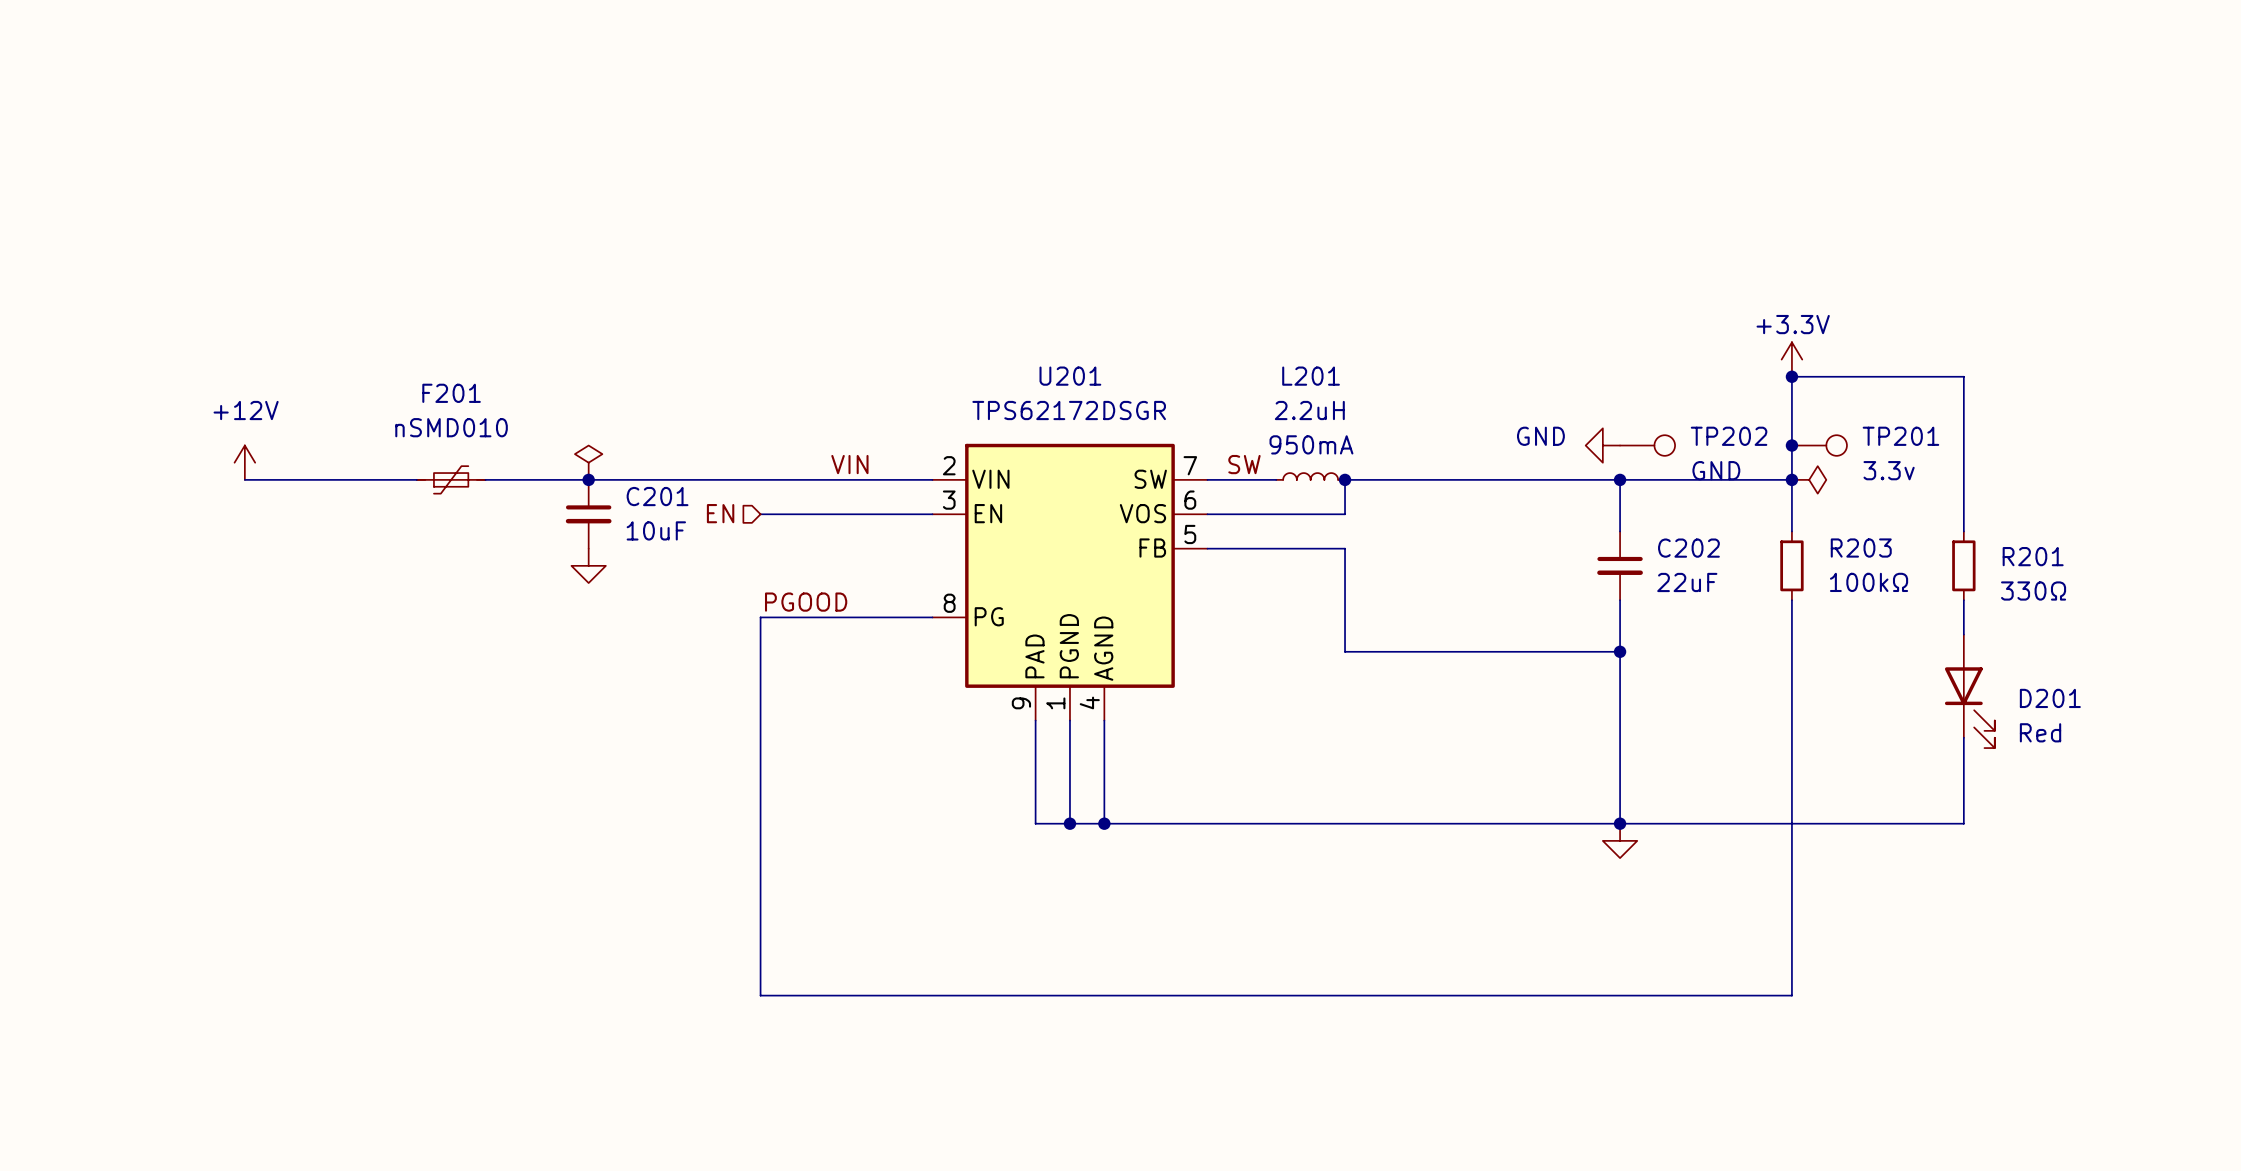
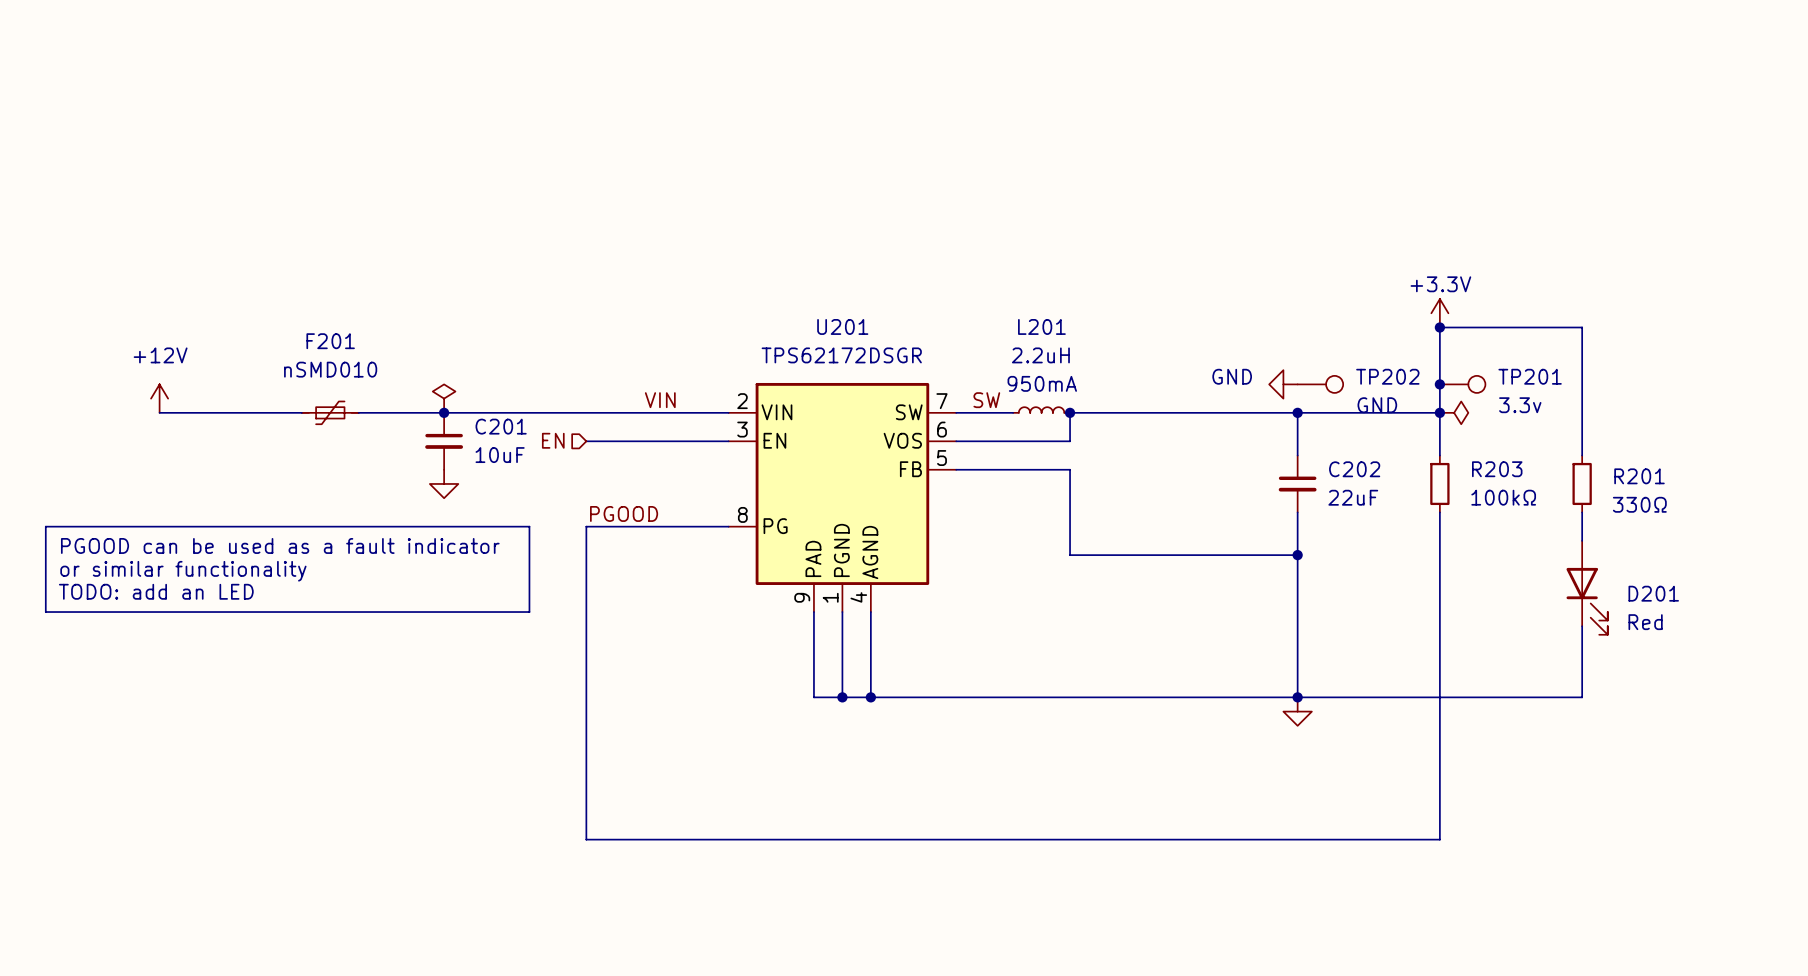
line: none -> (45, 526) (529, 526) (529, 612) (45, 612) (45, 526)
text: none -> PGOOD can be used as a fault indicator (280, 545)
text: none -> or similar functionality (183, 571)
text: none -> TODO: add an LED (156, 591)

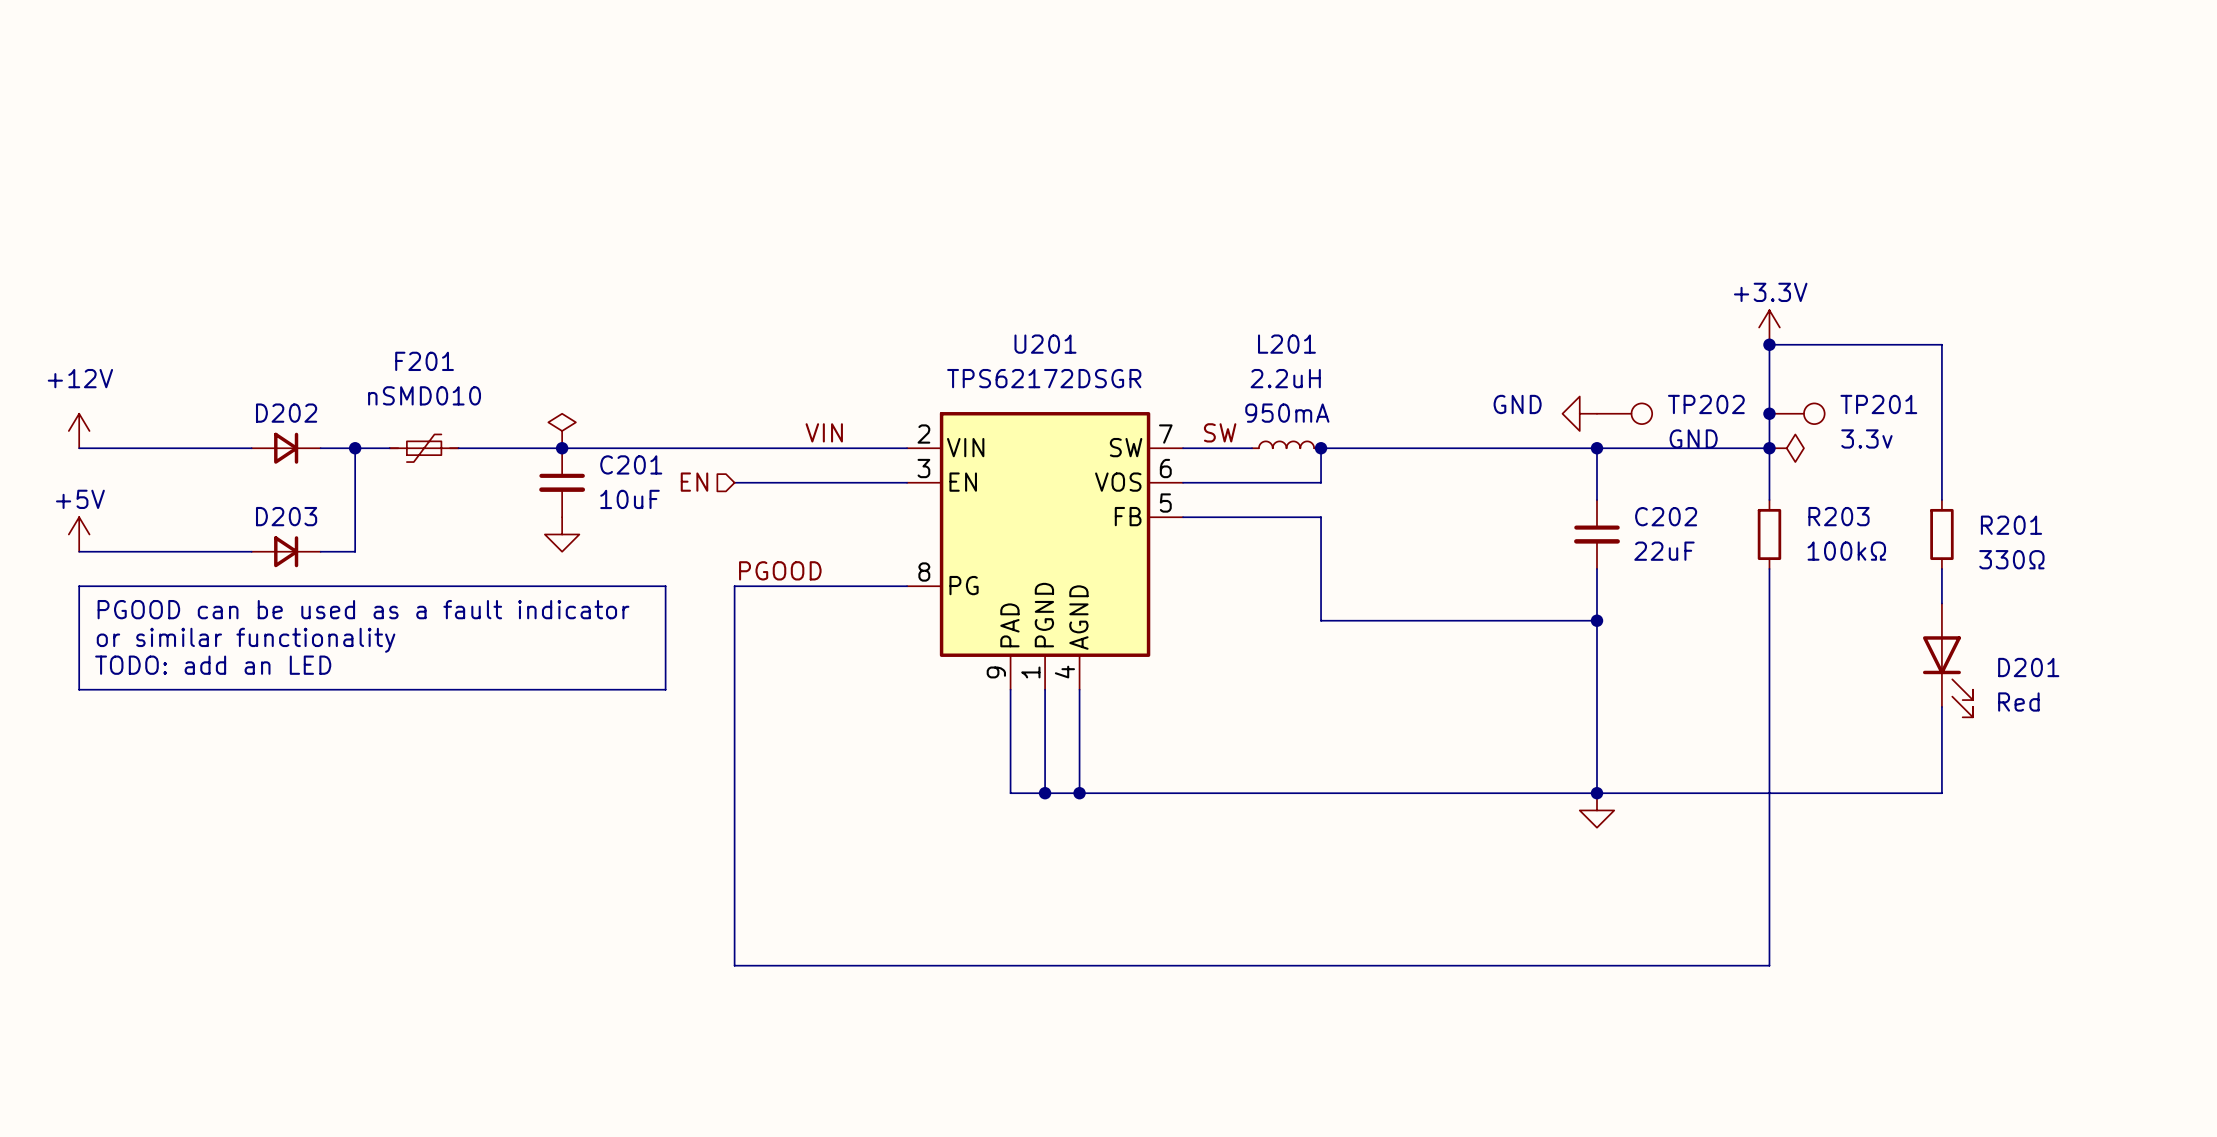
power symbol position: +12V (159, 398) -> +12V (79, 431)
wire: none -> (79, 448) (217, 448)
D202: none -> (286, 448)
wire: none -> (355, 448) (355, 551) (320, 551)
junction: none -> (355, 448)
power symbol: none -> +5V (79, 534)
wire: none -> (79, 551) (251, 551)
D203: none -> (286, 551)

